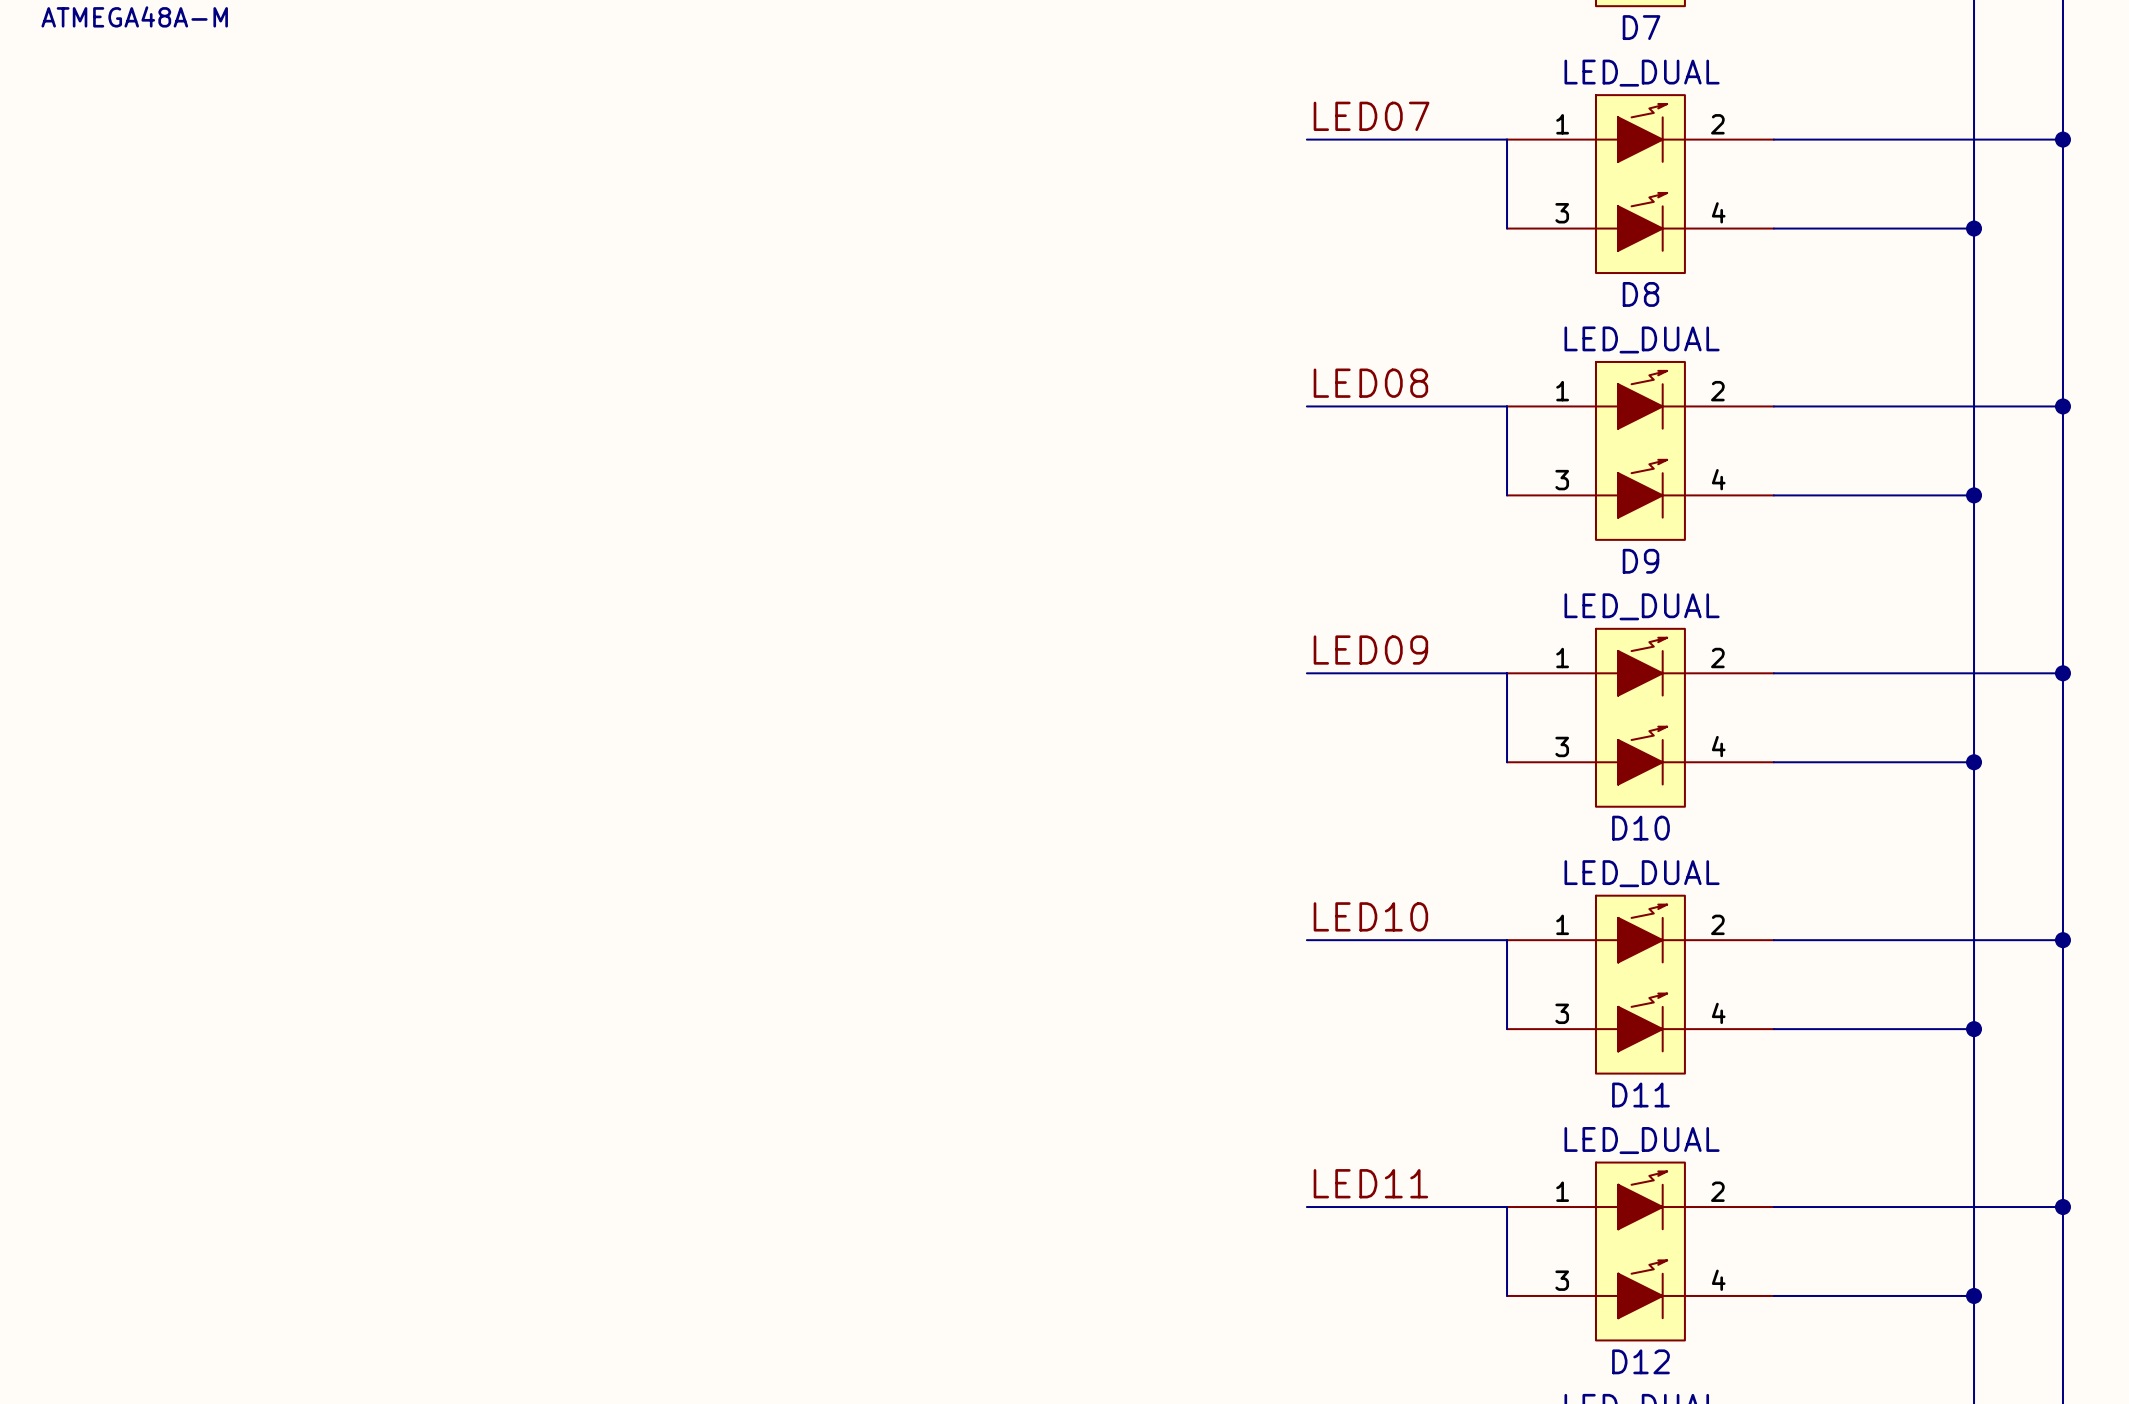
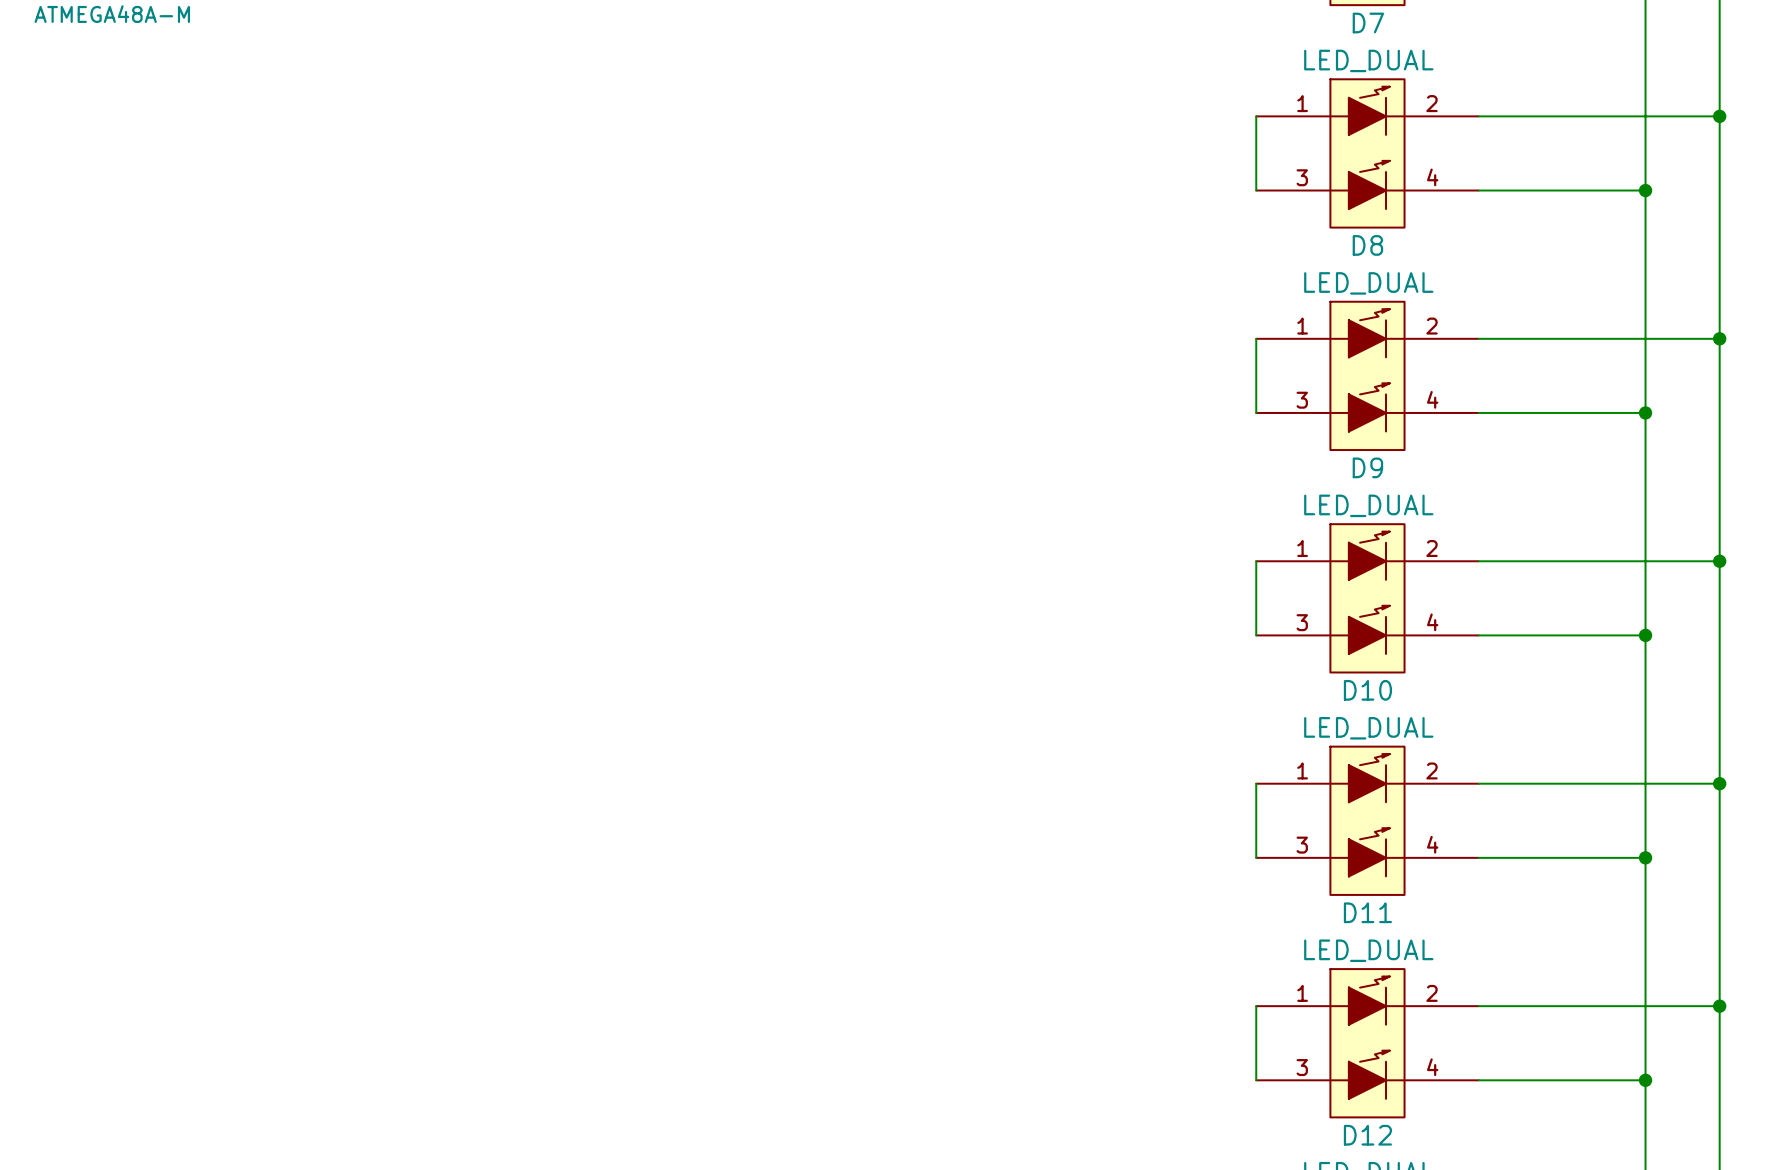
label: LED07 (1371, 116) -> none
wire: (1306, 139) (1507, 139) -> none
label: LED08 (1370, 383) -> none
wire: (1306, 406) (1507, 406) -> none
label: LED09 (1370, 650) -> none
wire: (1306, 673) (1507, 673) -> none
label: LED10 (1370, 916) -> none
wire: (1306, 940) (1507, 940) -> none
label: LED11 (1370, 1183) -> none
wire: (1306, 1207) (1507, 1207) -> none

